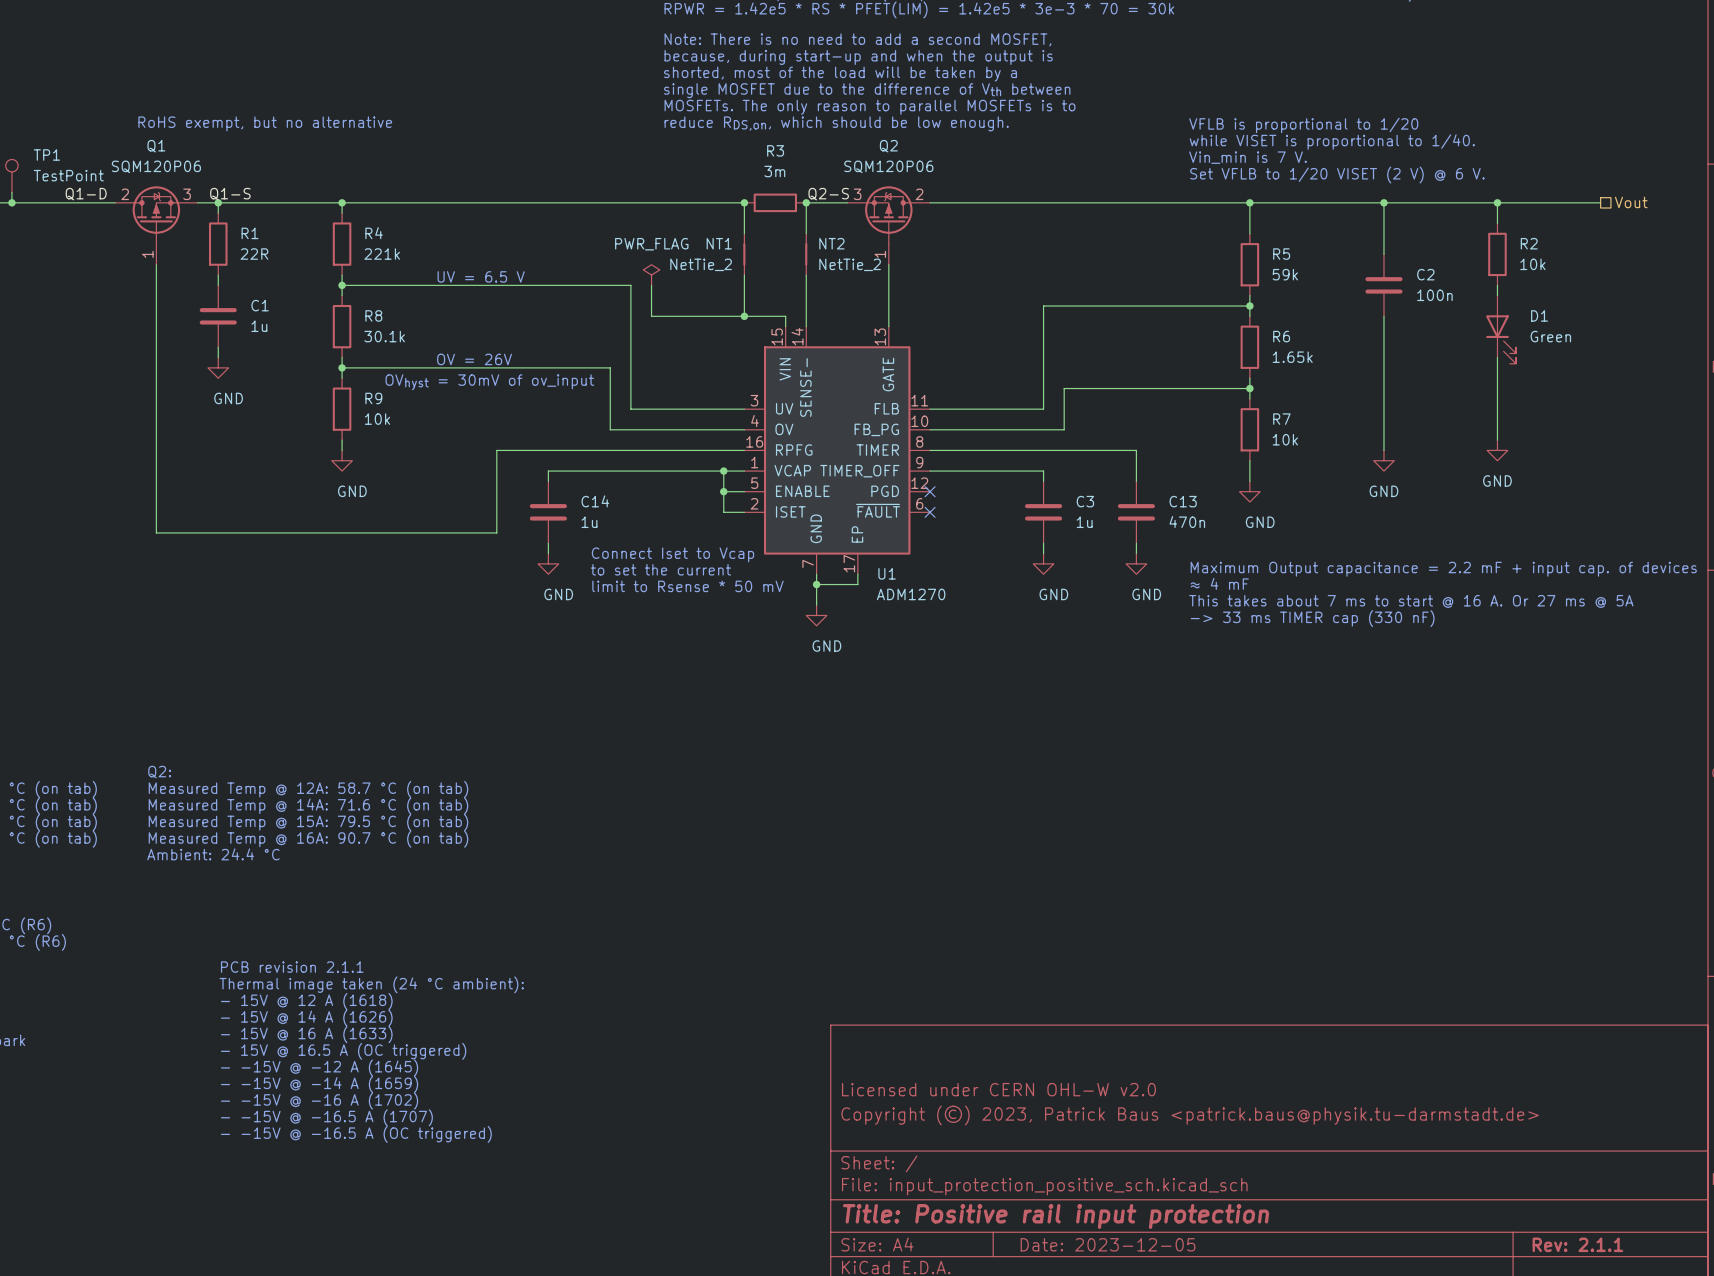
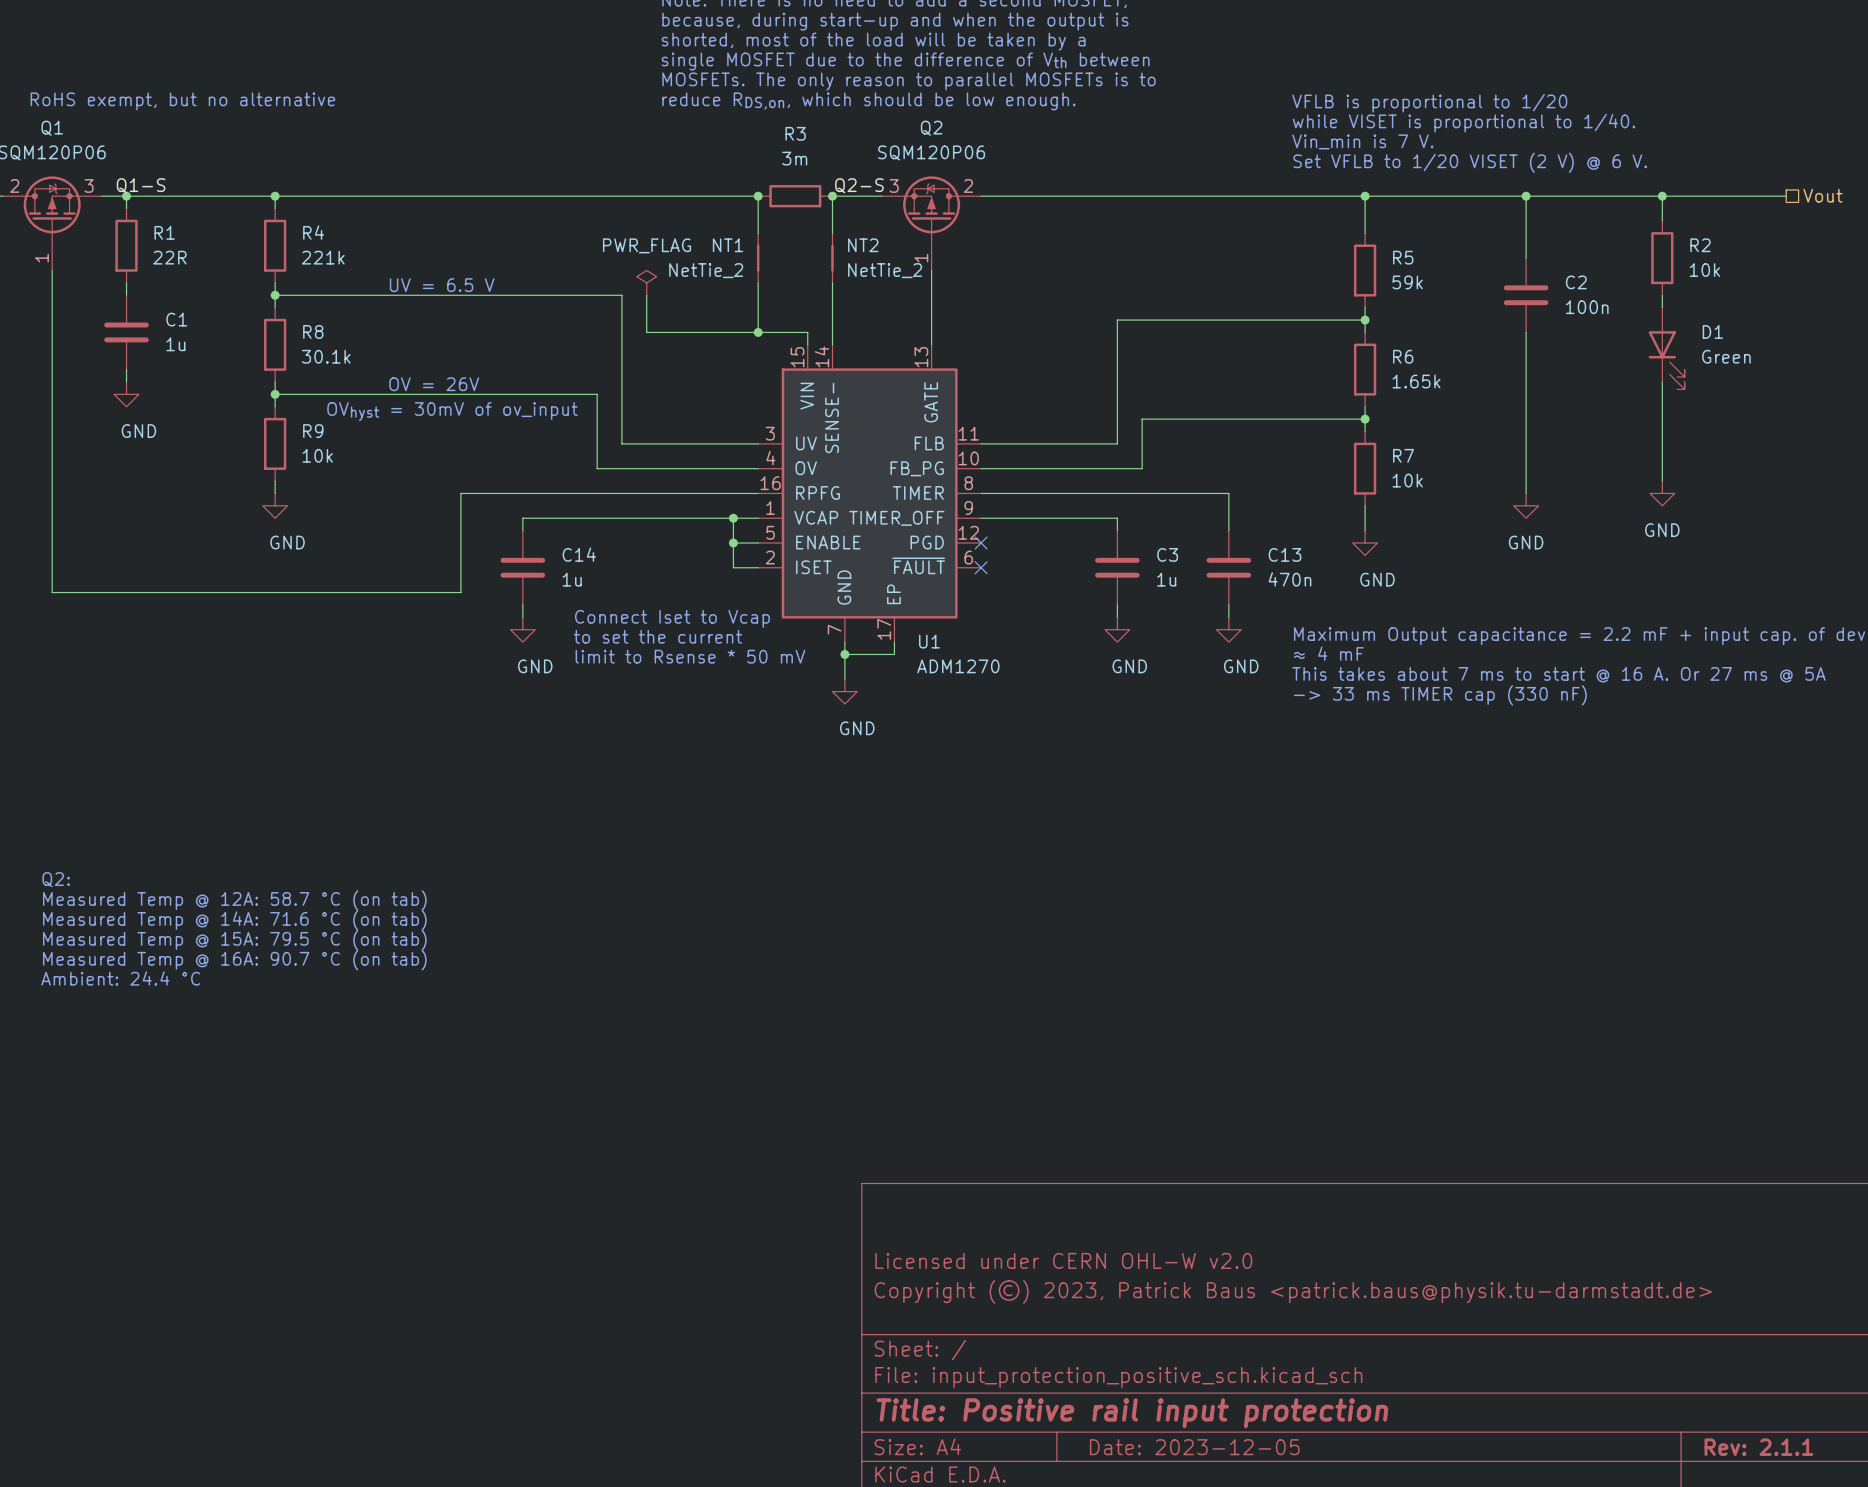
text: PCB revision 2.1.1 (292, 967) -> none
text: Thermal image taken (24 °C ambient): (371, 984) -> none
text: - 15V @ 12 A (1618) (306, 1001) -> none
text: - 15V @ 14 A (1626) (306, 1018) -> none
text: - 15V @ 16 A (1633) (306, 1034) -> none
text: - 15V @ 16.5 A (OC triggered) (343, 1051) -> none
text: - -15V @ -12 A (1645) (319, 1067) -> none
text: - -15V @ -14 A (1659) (319, 1084) -> none
text: - -15V @ -16 A (1702) (319, 1101) -> none
text: - -15V @ -16.5 A (1707) (326, 1117) -> none
text: - -15V @ -16.5 A (OC triggered) (356, 1134) -> none

